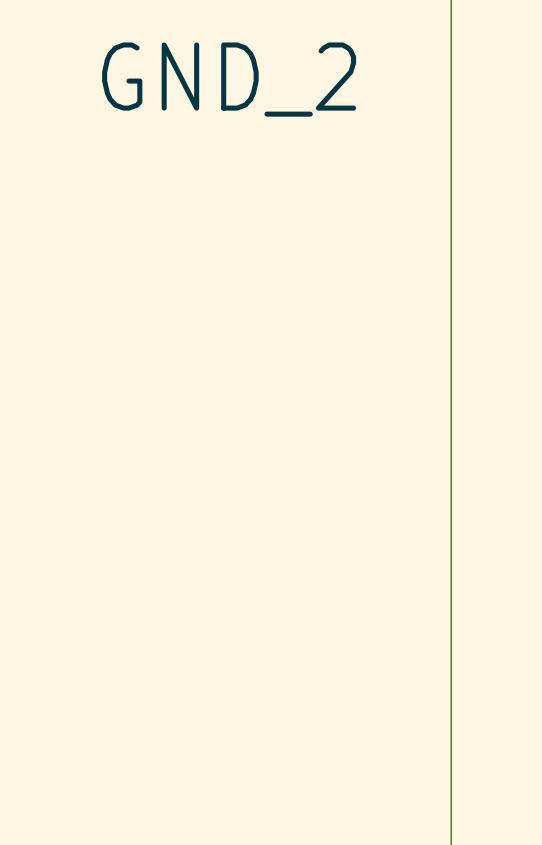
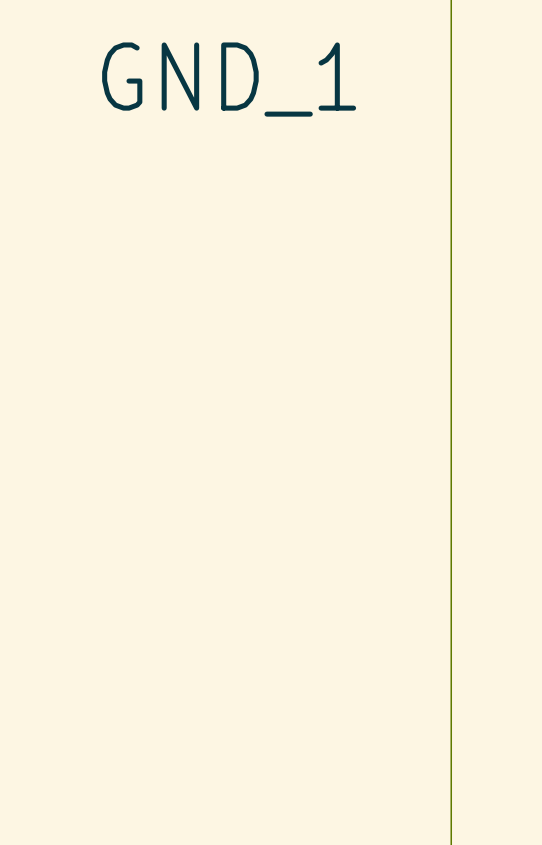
label: GND_2 (229, 79) -> GND_1 (229, 79)

